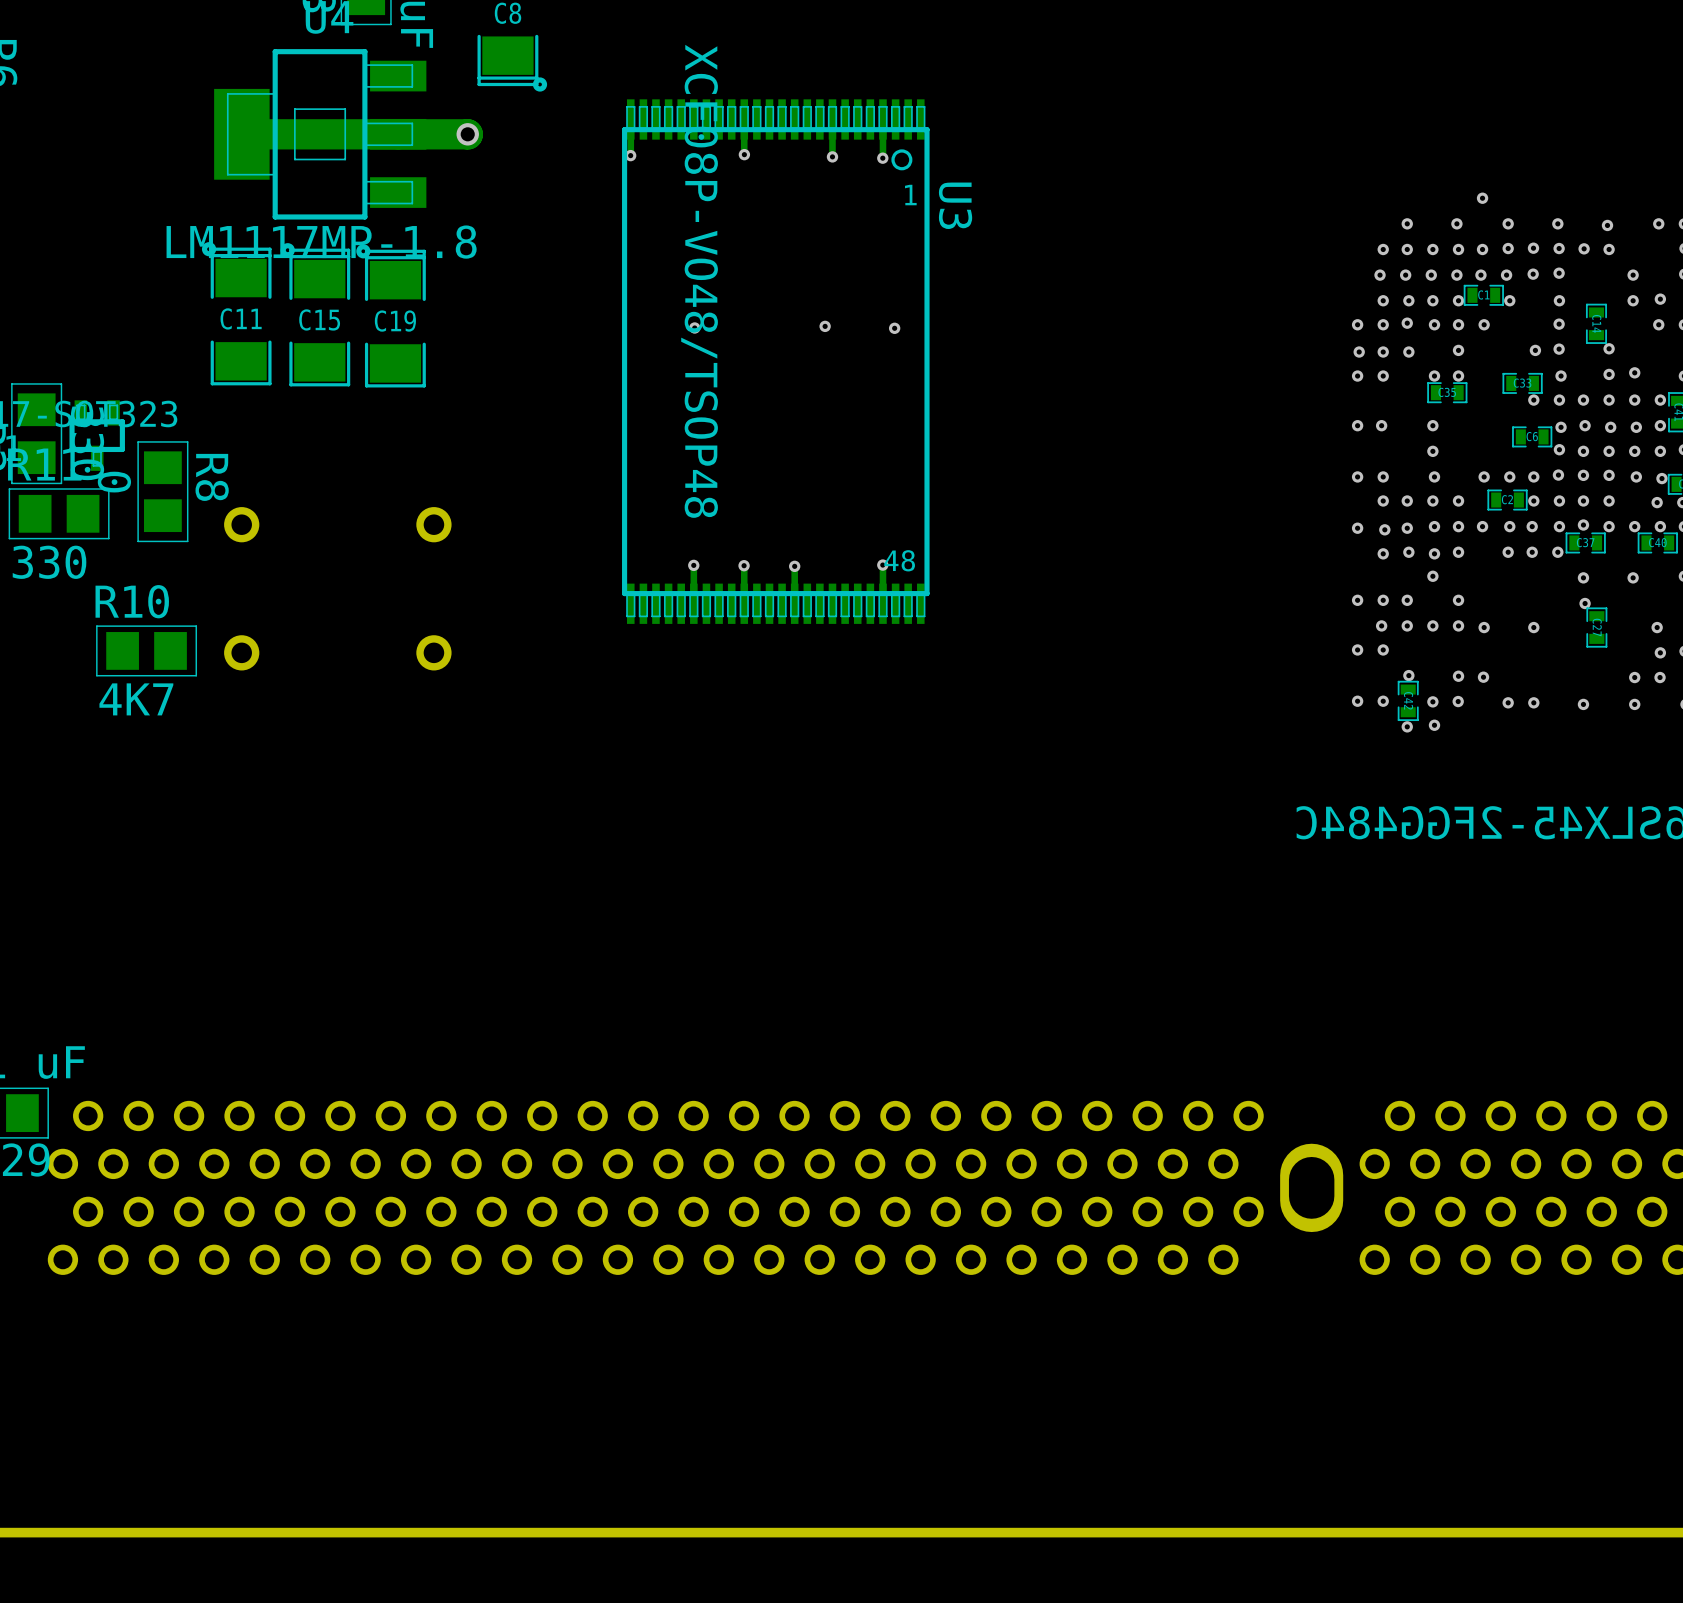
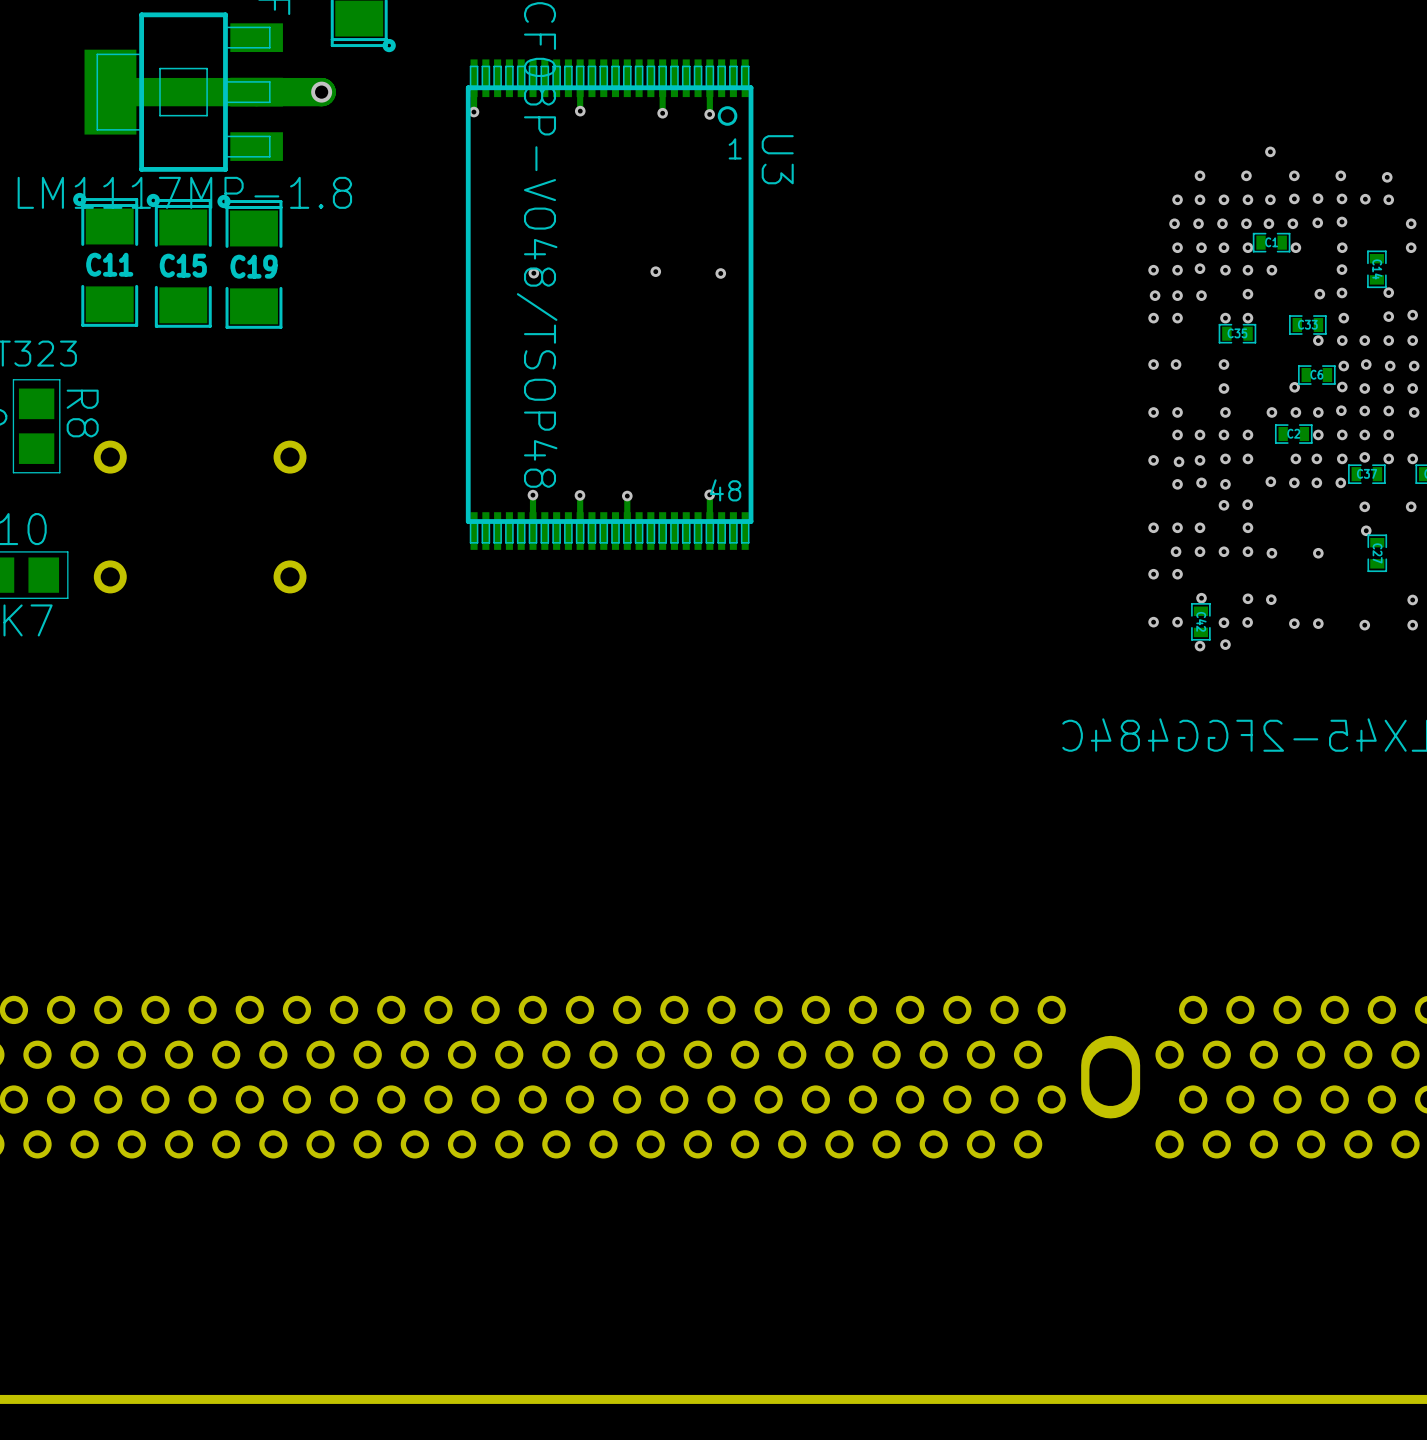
via: none -> (1294, 387)
via: (1482, 526) -> none
via: none -> (1270, 481)
via: (1458, 552) -> none
via: none -> (1247, 504)

